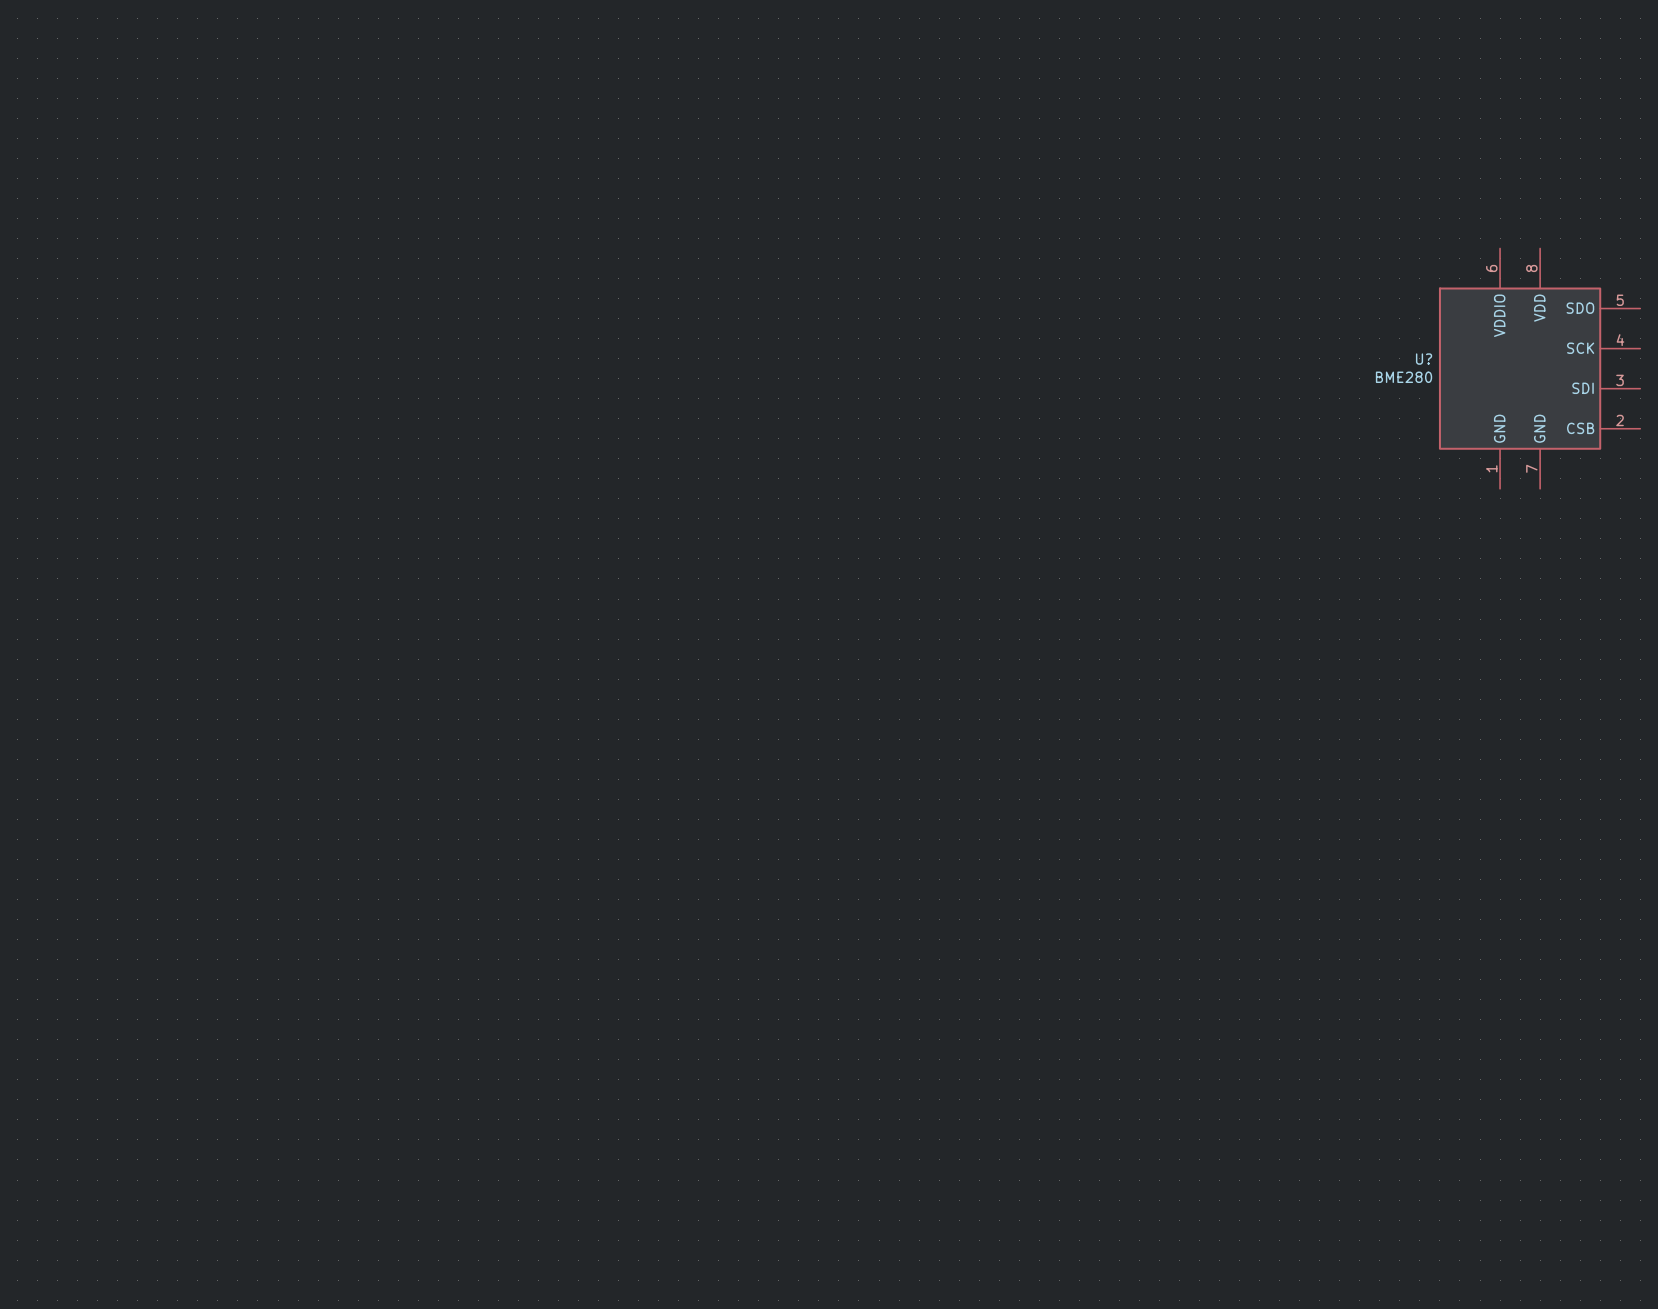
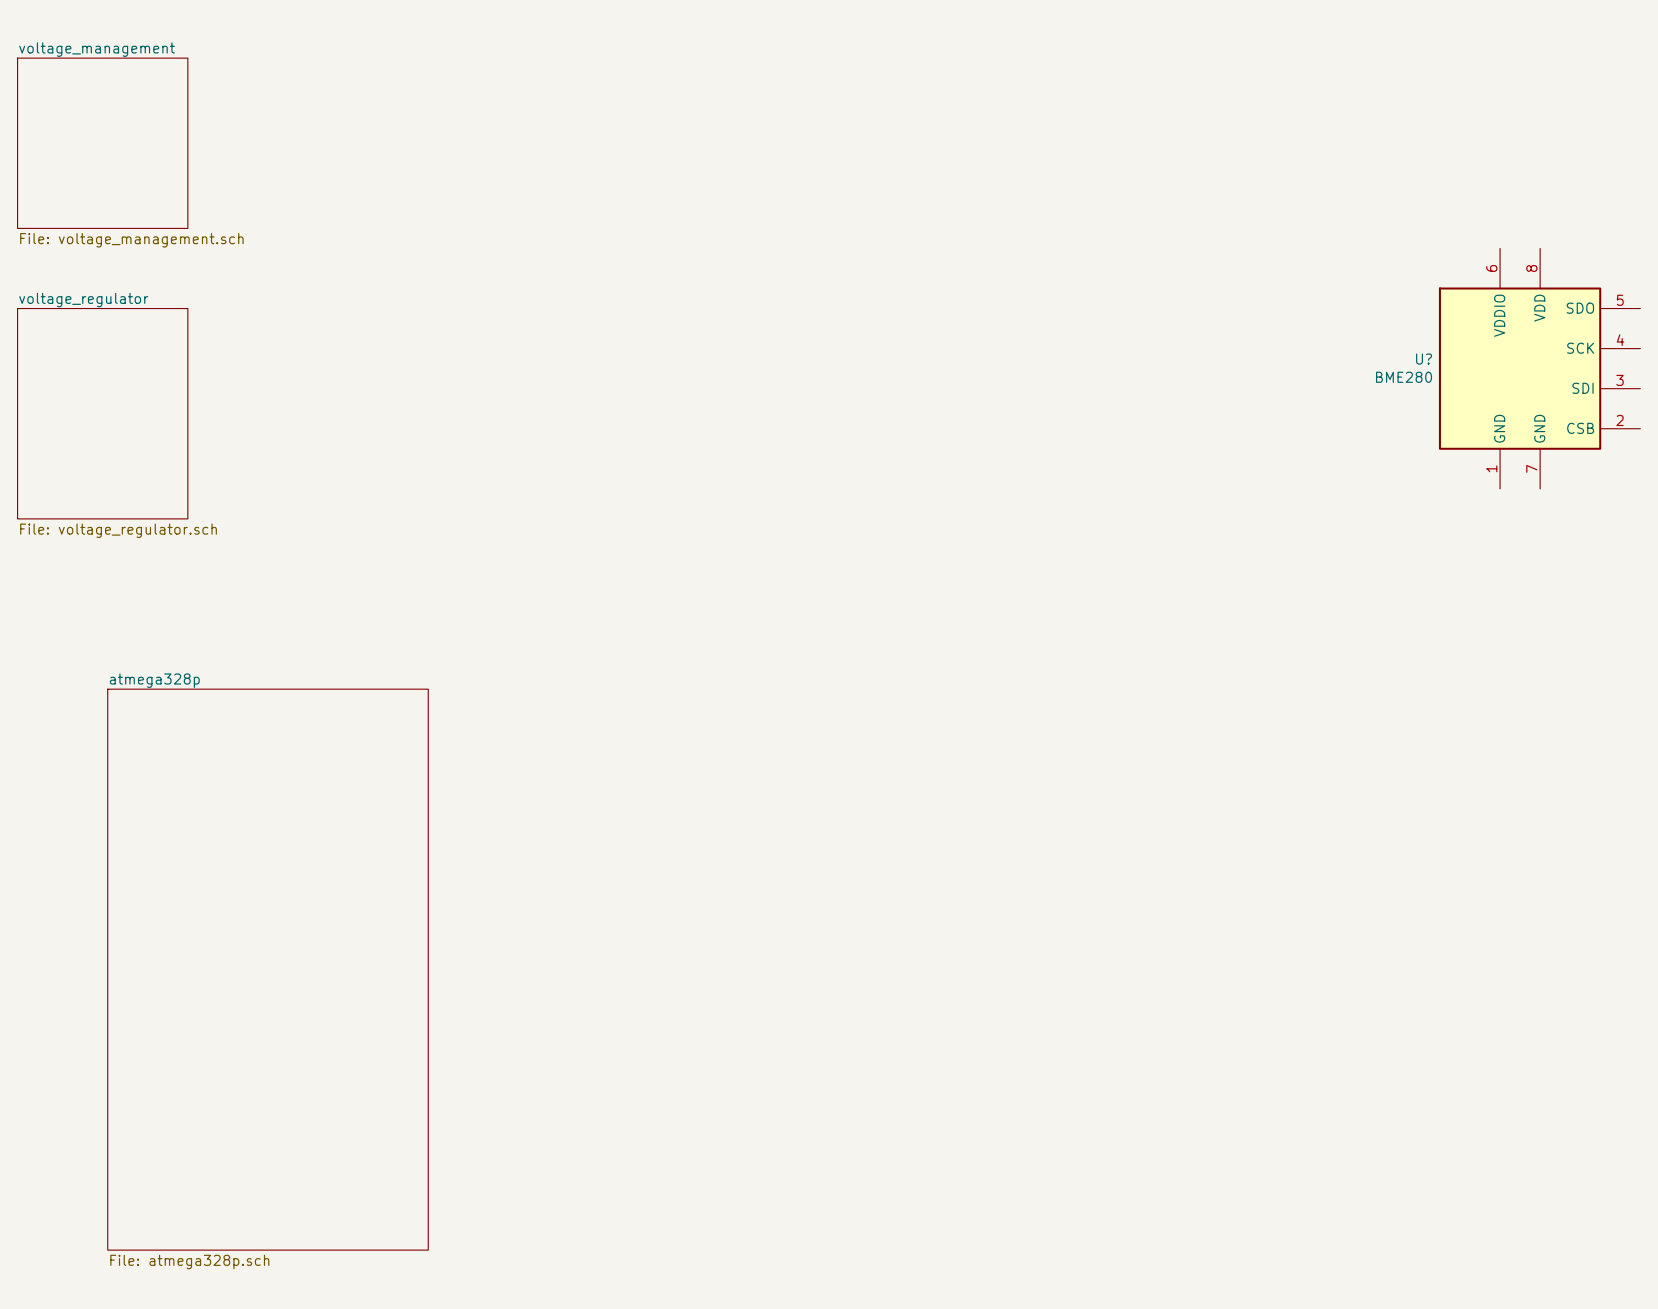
sheet voltage_management: none -> File: voltage_management.sch (102, 143)
sheet voltage_regulator: none -> File: voltage_regulator.sch (102, 413)
sheet atmega328p: none -> File: atmega328p.sch (267, 969)

